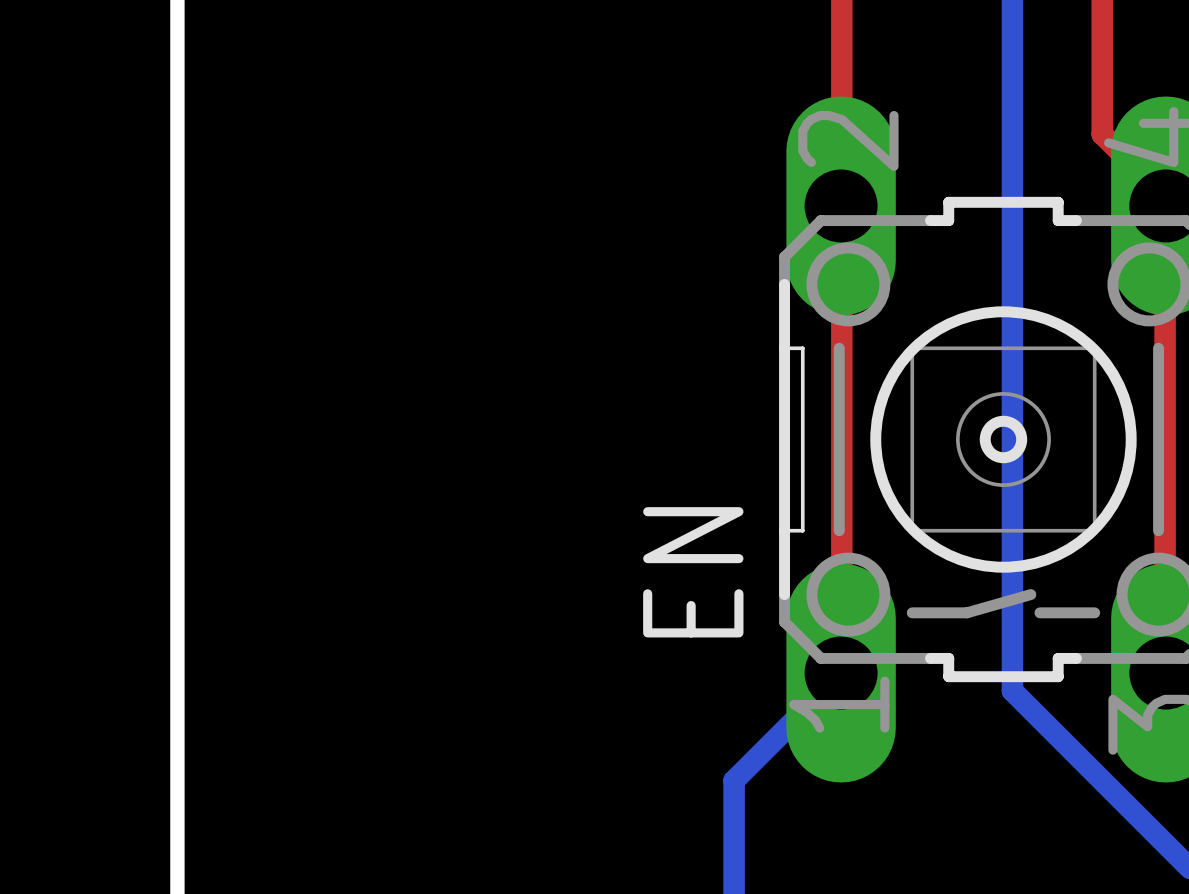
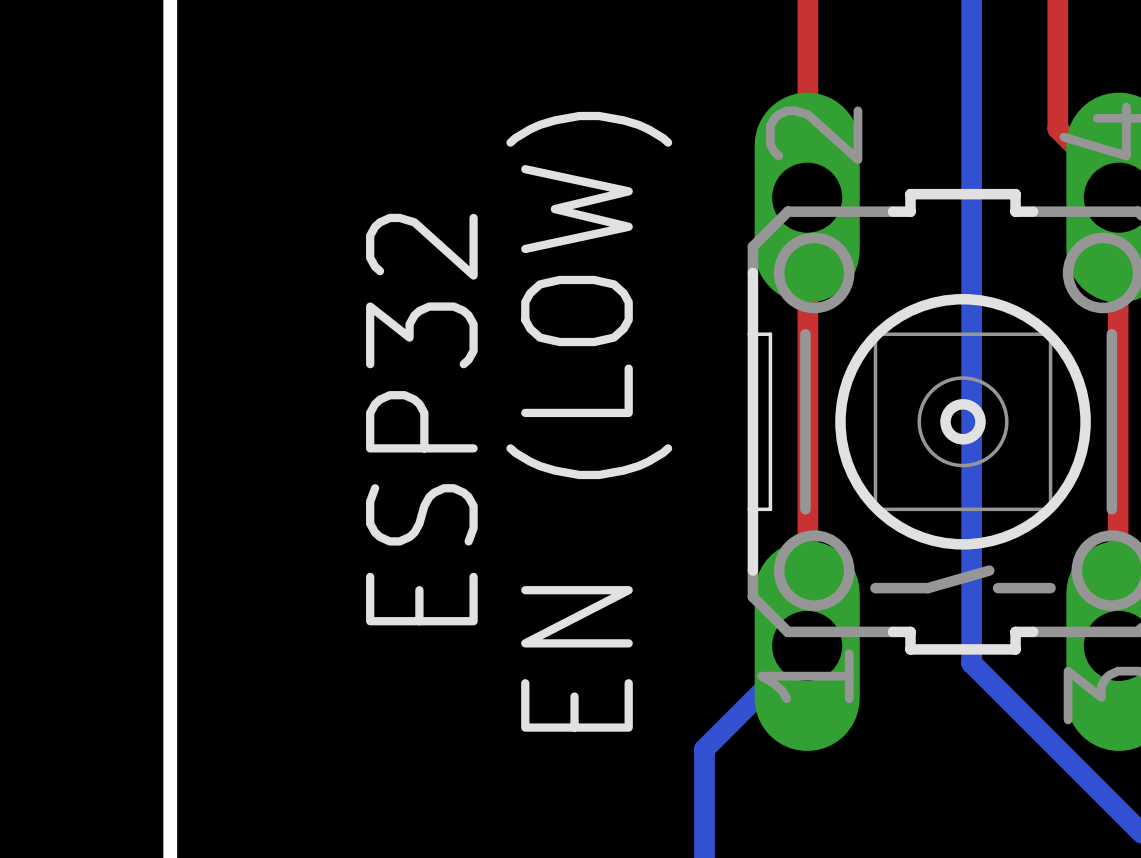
text: none -> ESP32 (421, 419)
text: none -> EN (LOW) (589, 421)
EN name: EN (693, 572) -> none

